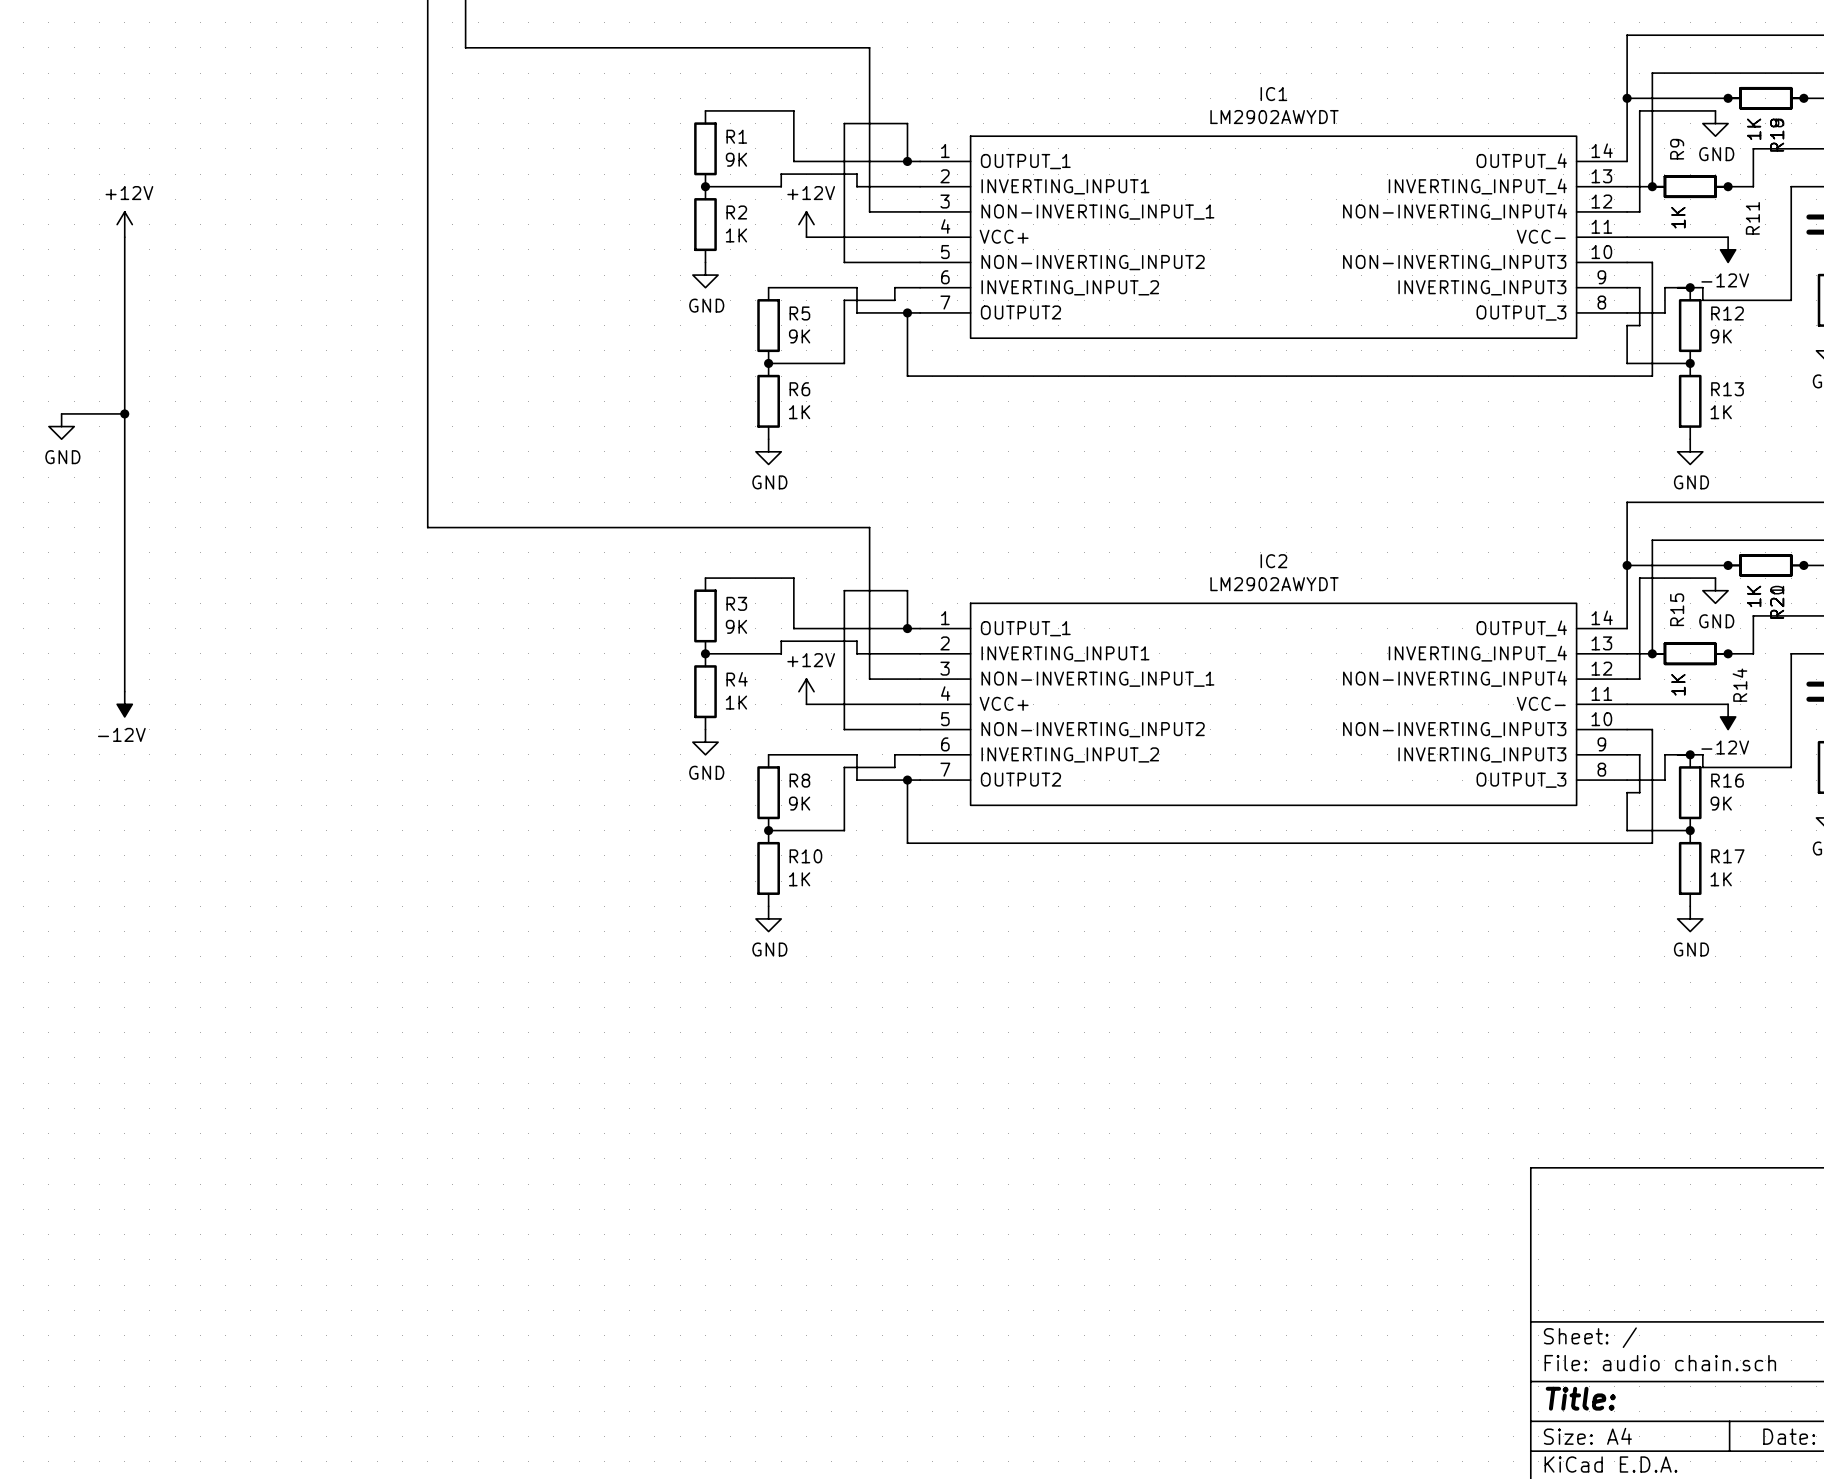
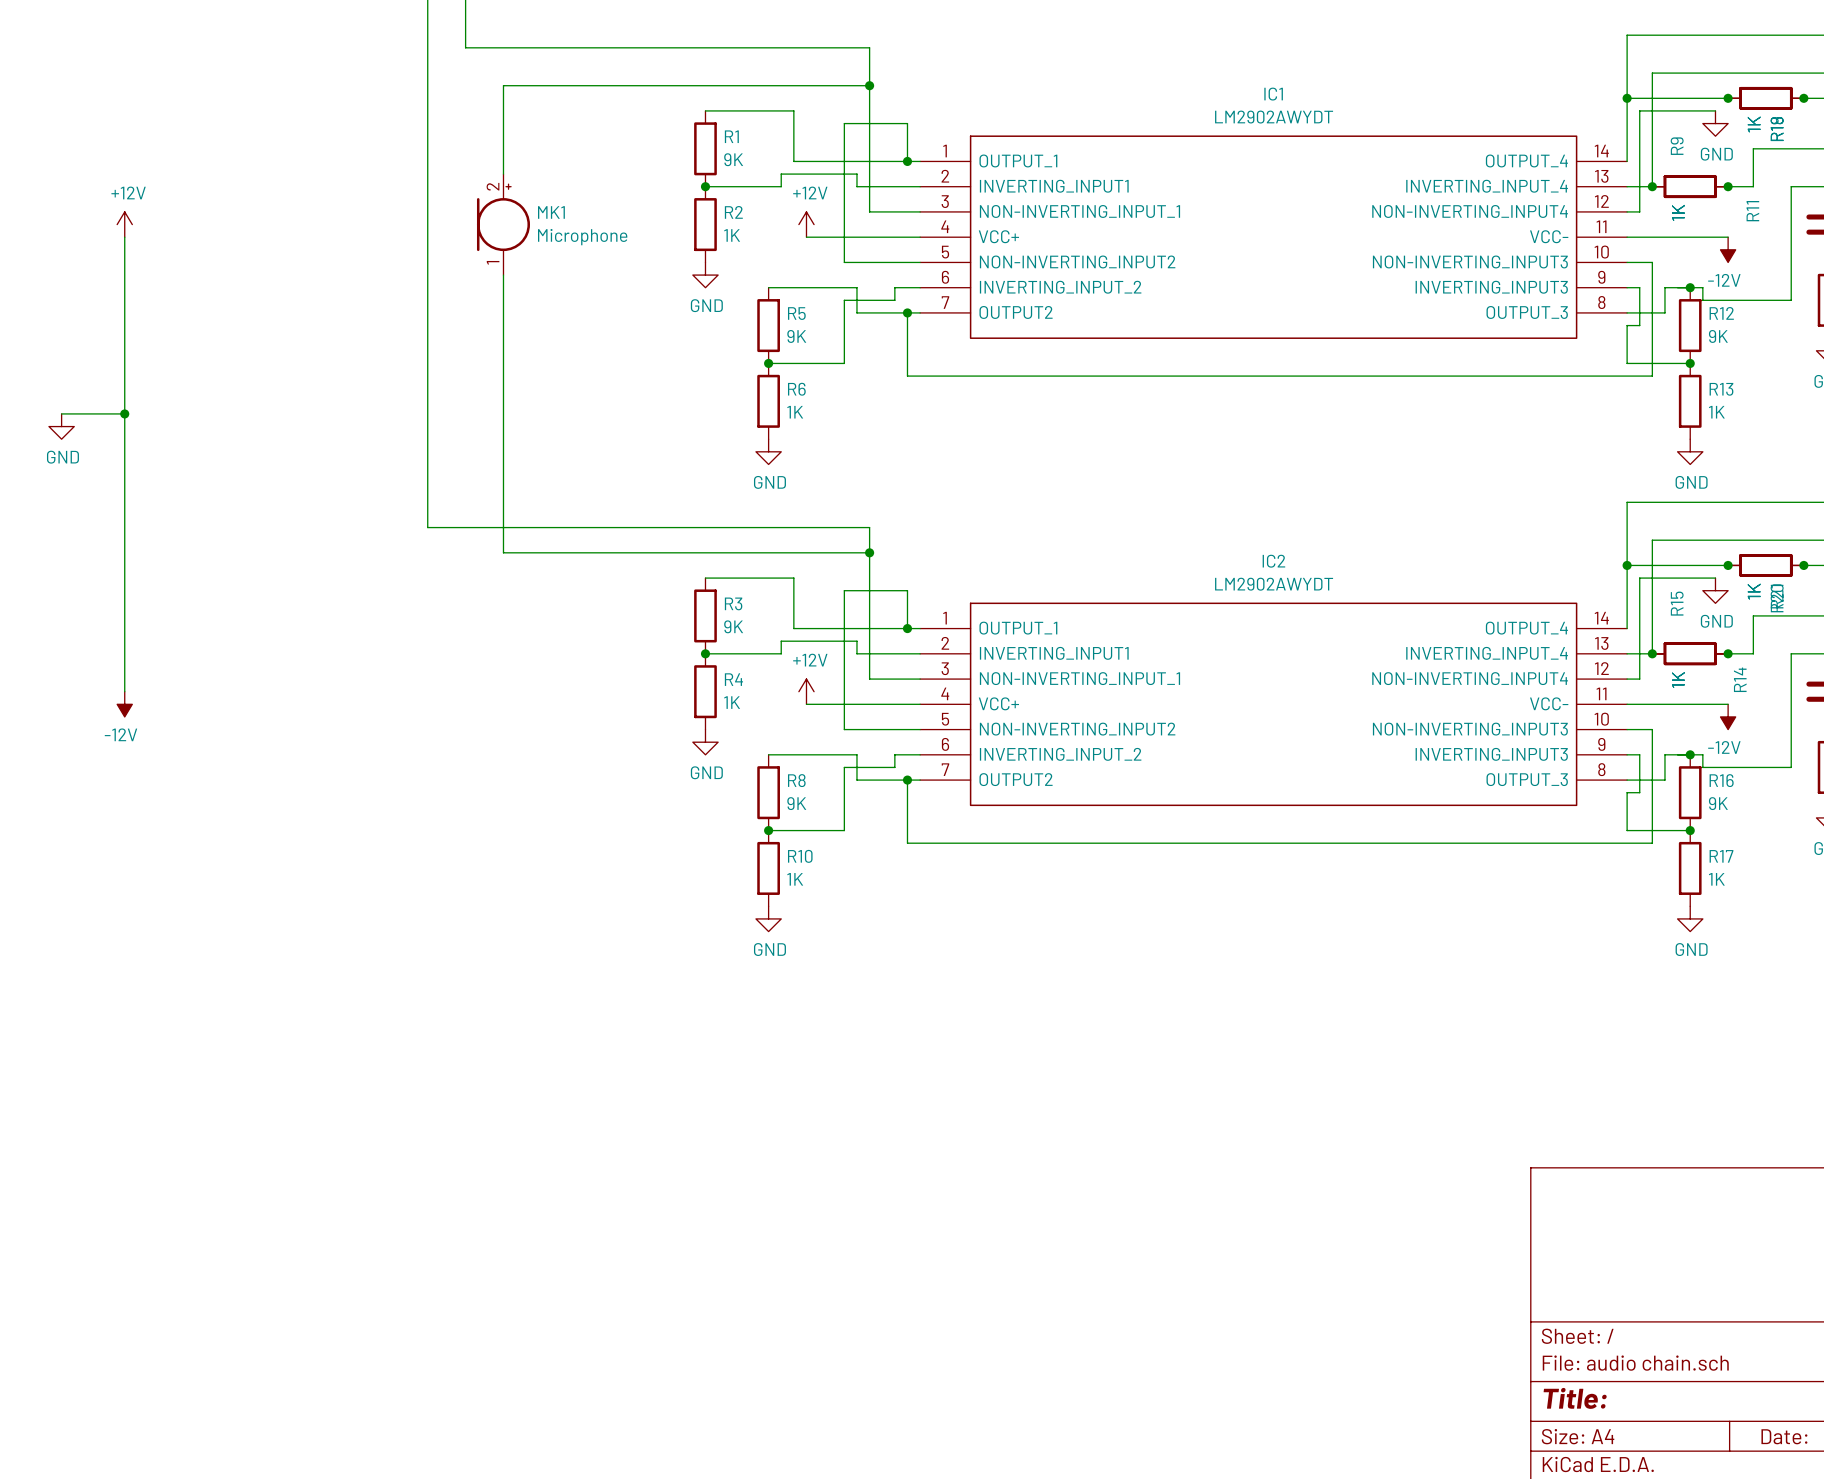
wire: none -> (869, 85) (503, 85) (503, 174)
junction: none -> (869, 85)
MK1: none -> Microphone (503, 224)
wire: none -> (503, 275) (503, 552) (869, 552)
junction: none -> (869, 552)

